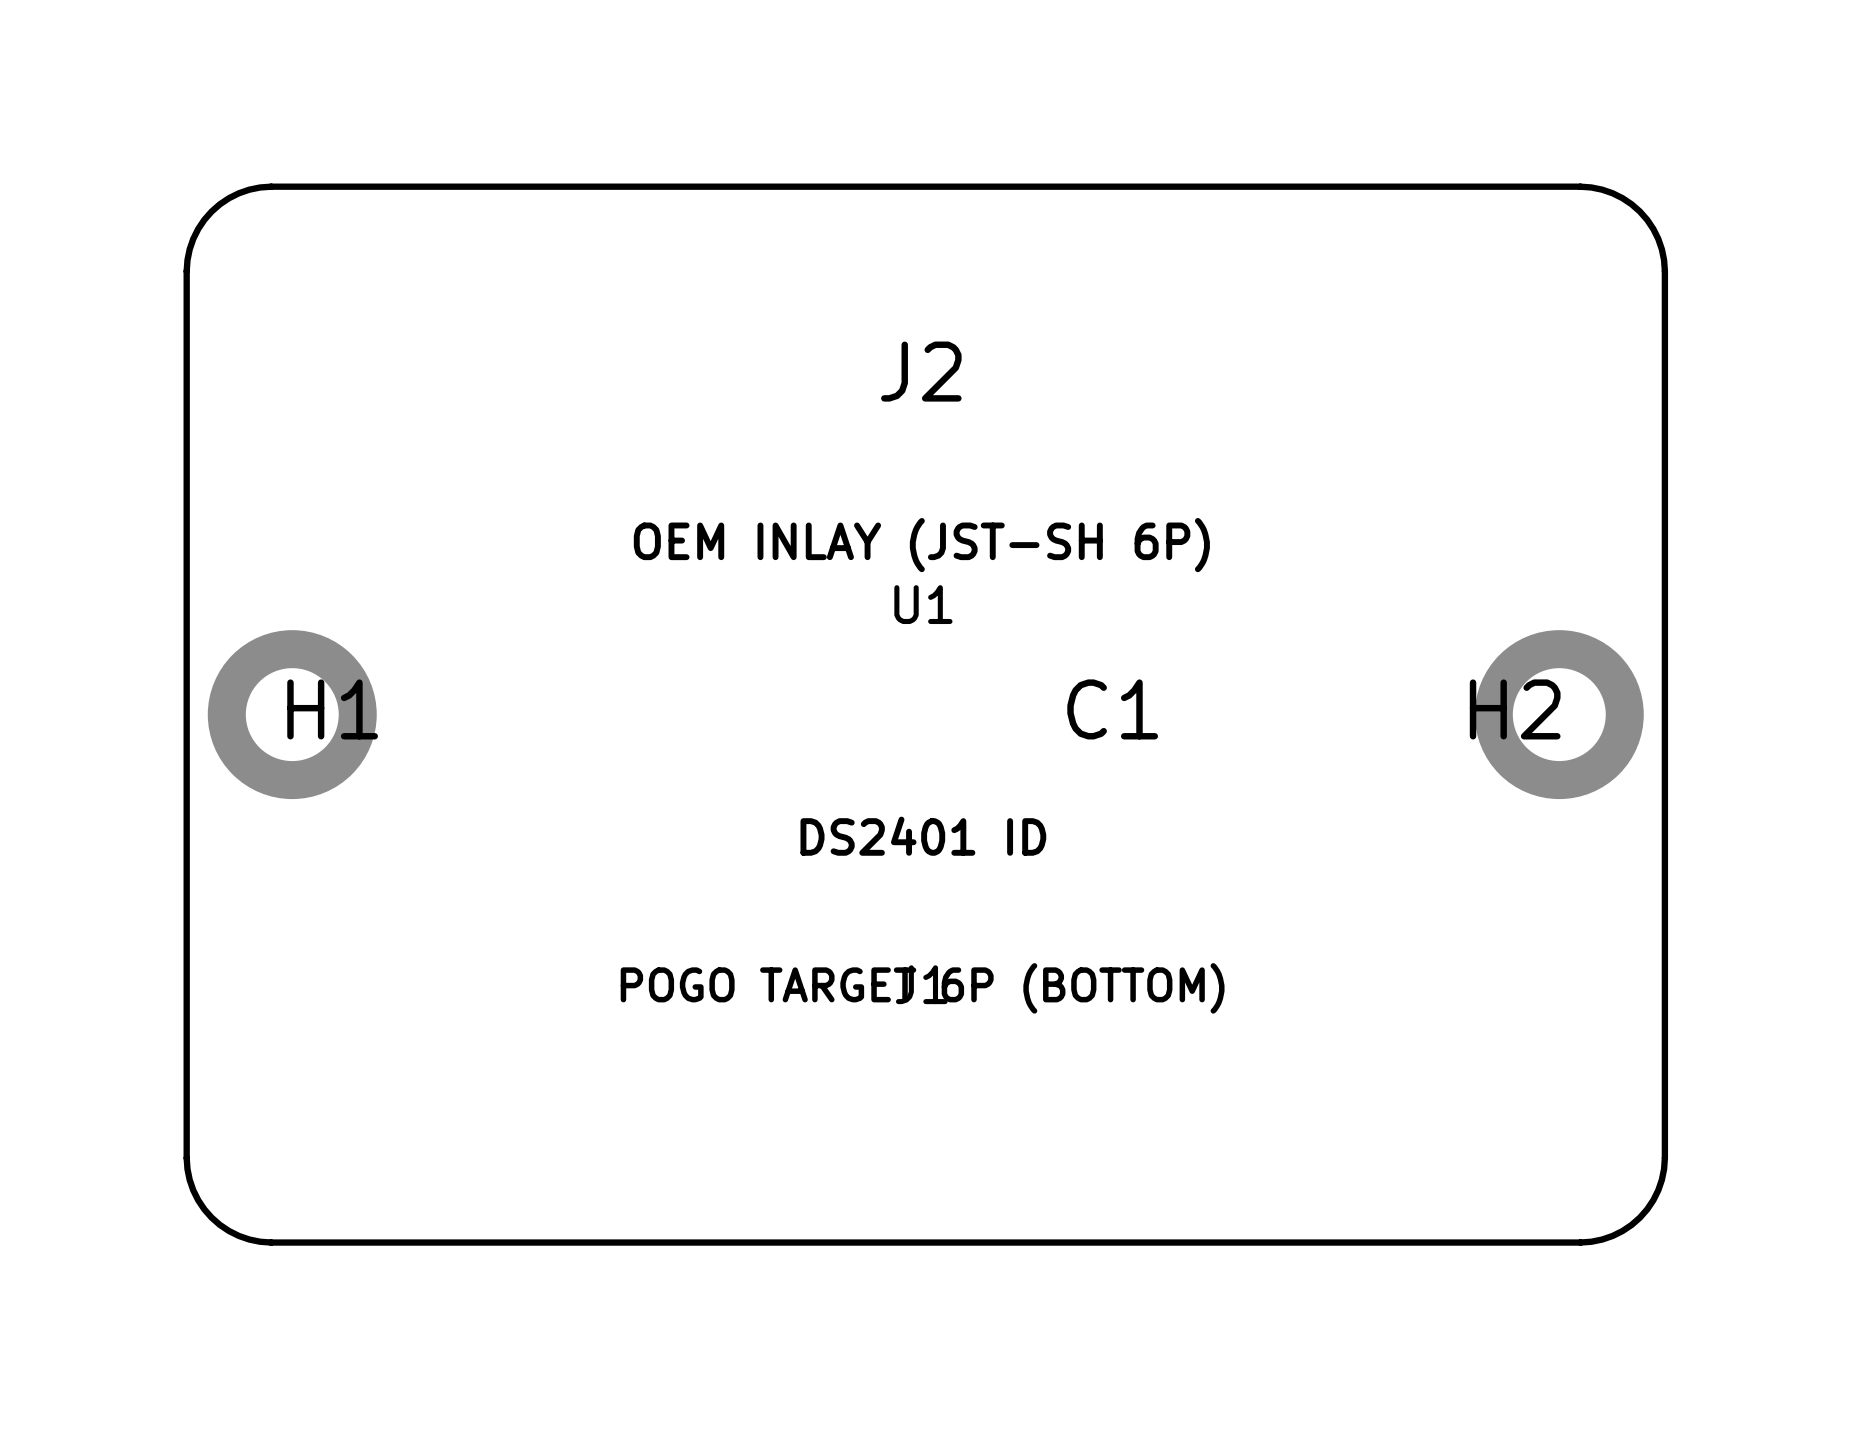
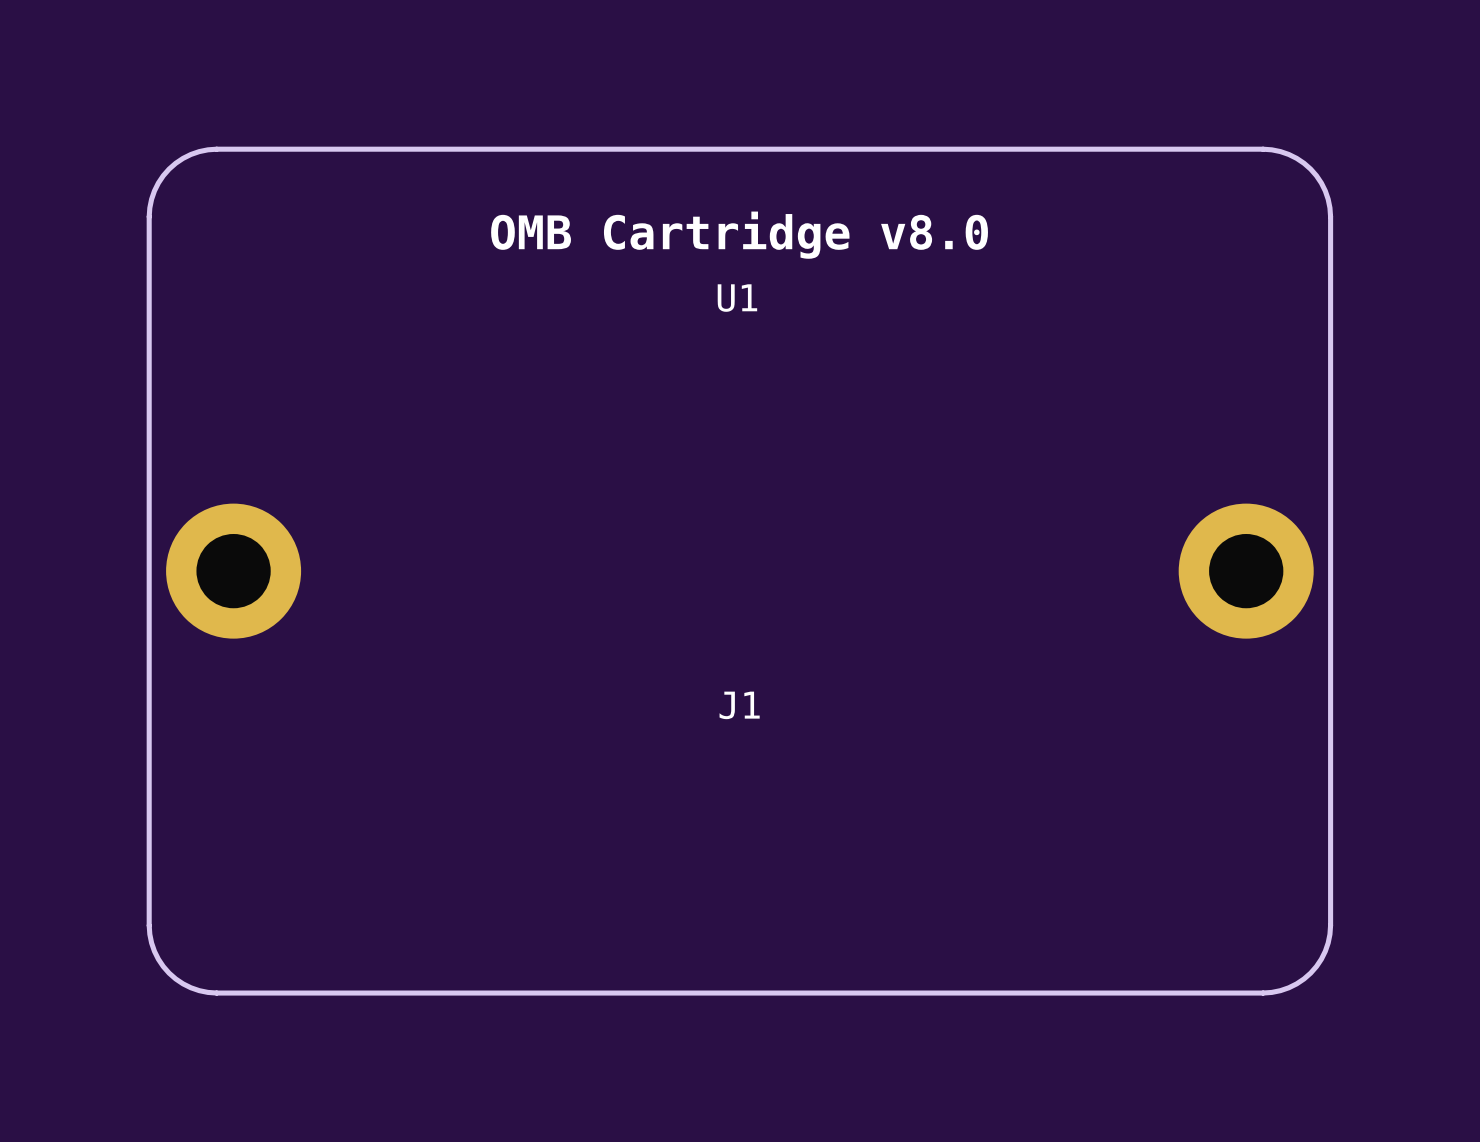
text: none -> OMB Cartridge v8.0 (739, 235)
J2 name: J2 (921, 371) -> U1 (737, 298)
text: OEM INLAY (JST-SH 6P) (921, 545) -> none
U1: (923, 604) -> none
H1: (332, 709) -> none
C1: (1112, 709) -> none
H2: (1515, 709) -> none
text: DS2401 ID (923, 836) -> none
J1 position: (921, 984) -> (739, 705)
text: POGO TARGET 6P (BOTTOM) (922, 988) -> none

